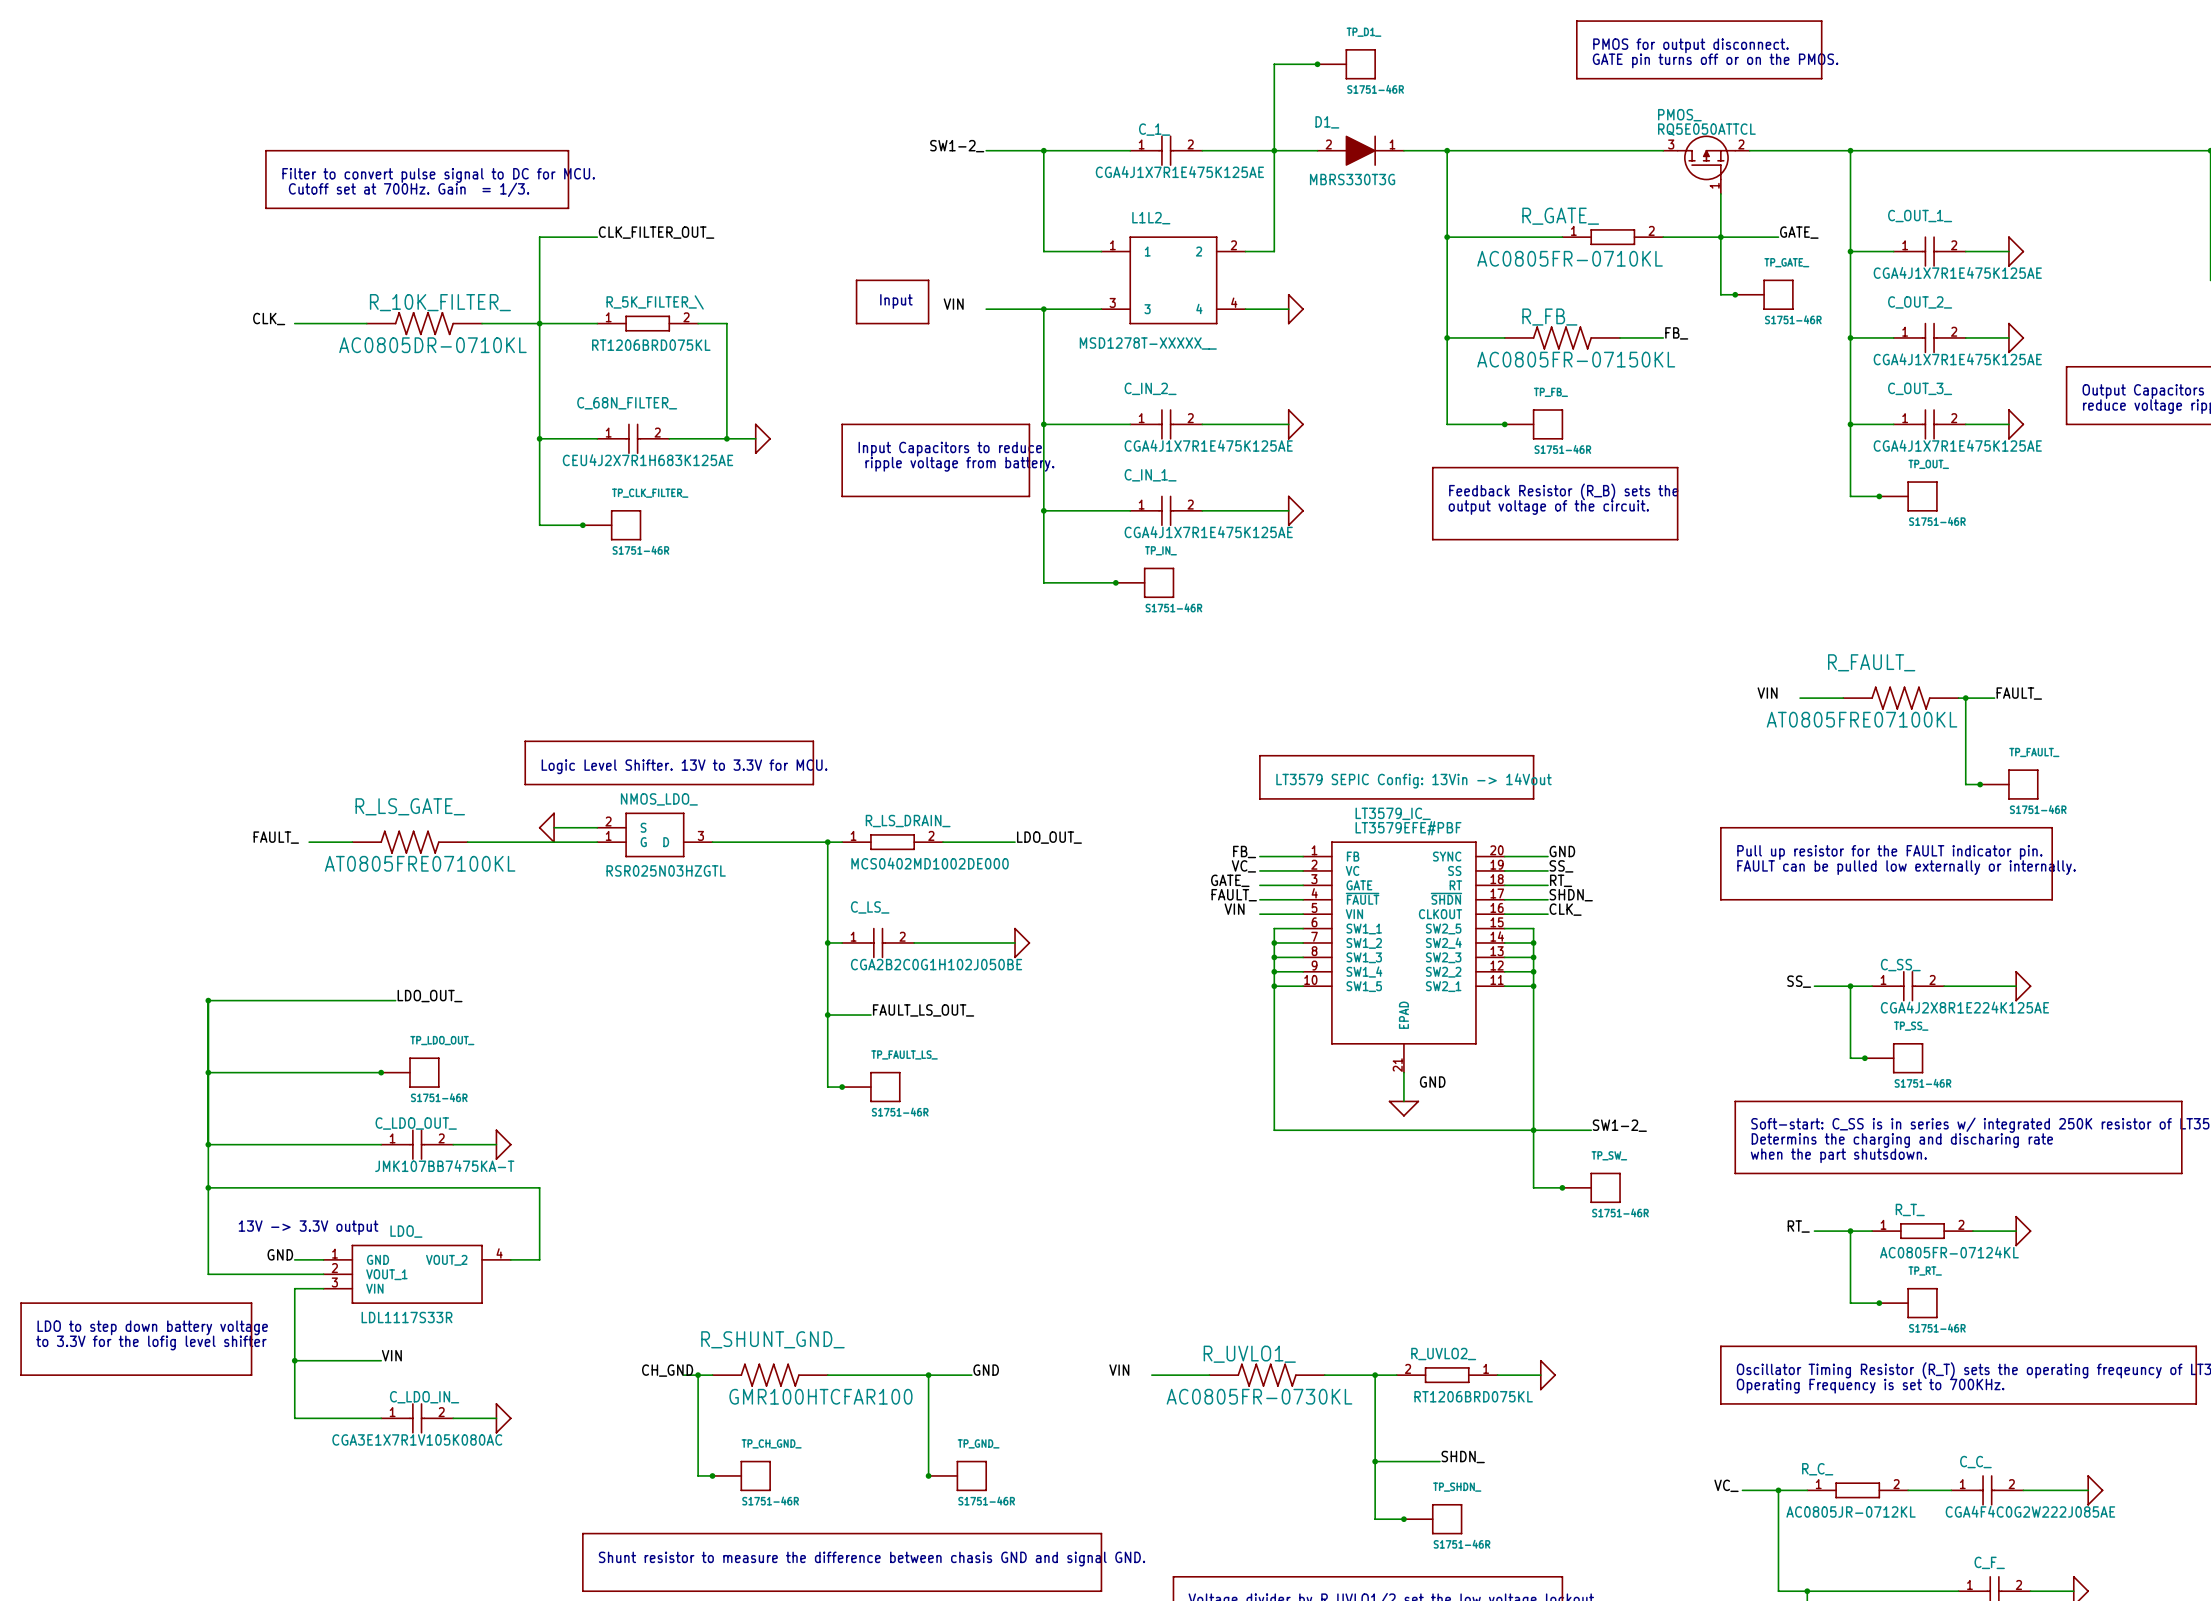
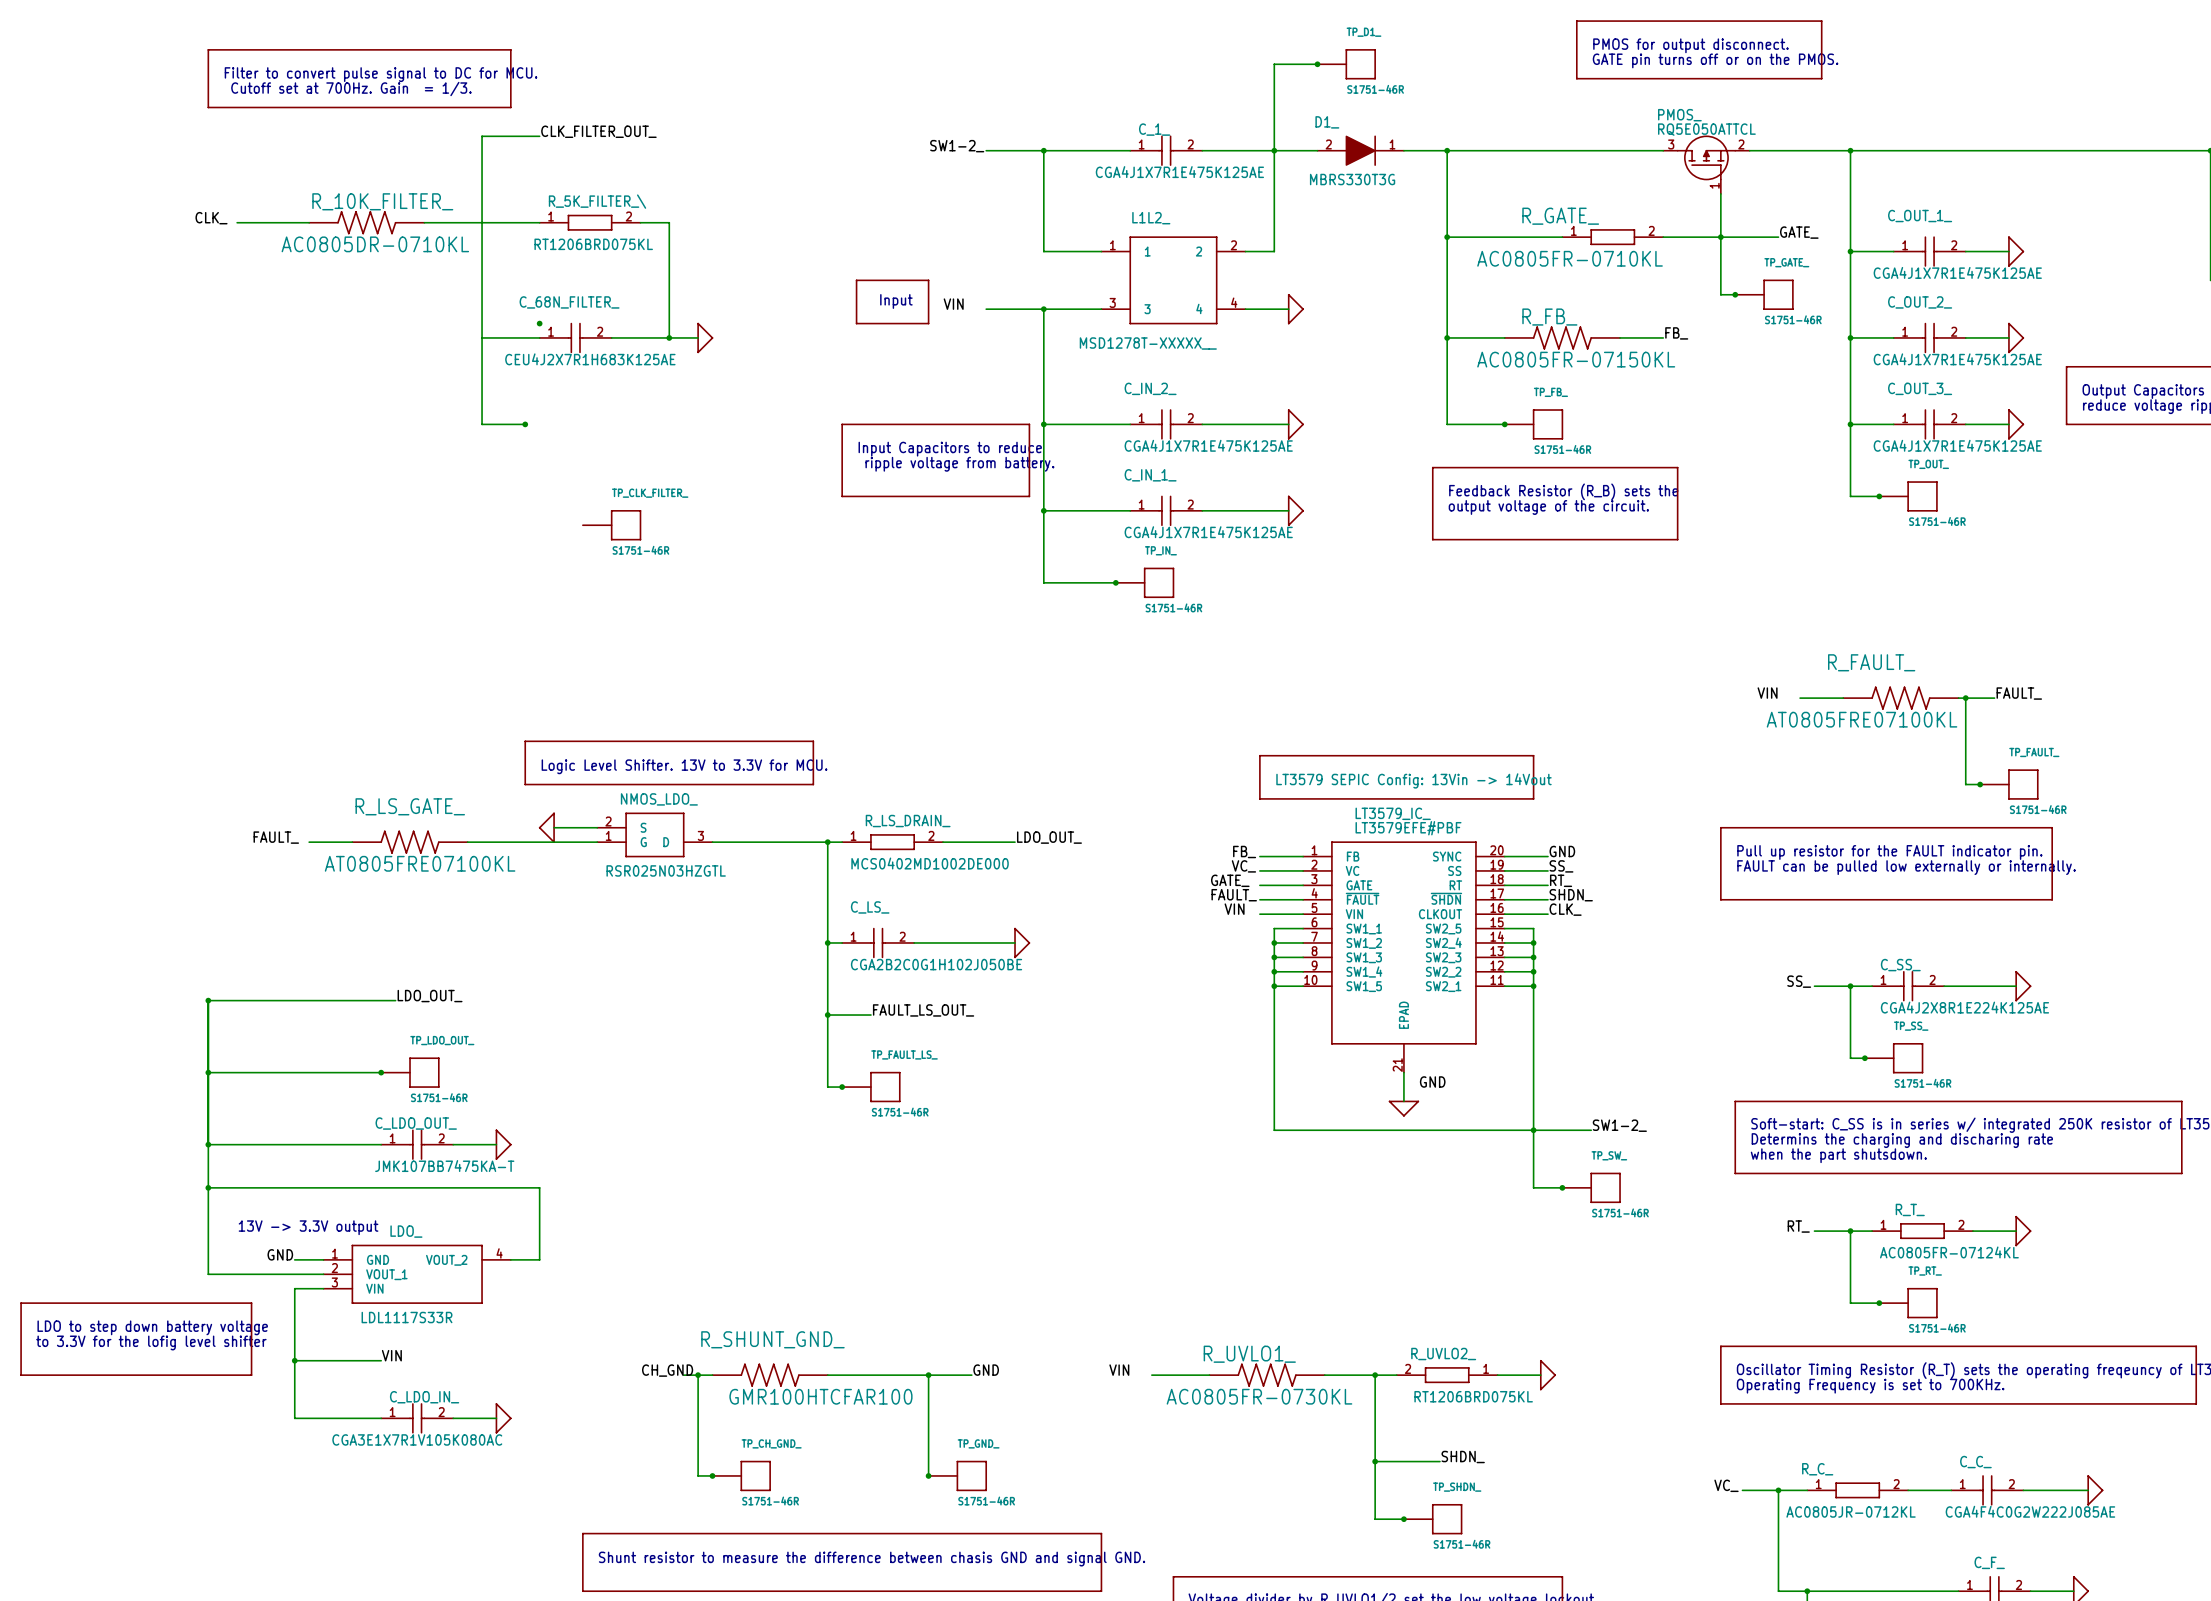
line: (265, 150) (265, 208) (568, 208) (568, 150) (265, 150) -> (208, 49) (208, 107) (510, 107) (510, 49) (208, 49)
text position: Filter to convert pulse signal to DC for MCU. (438, 175) -> Filter to convert pulse signal to DC for MCU. (381, 74)
text position: Cutoff set at 700Hz. Gain = 1/3. (409, 189) -> Cutoff set at 700Hz. Gain = 1/3. (351, 89)
label position: CLK_FILTER_OUT_ (656, 232) -> CLK_FILTER_OUT_ (598, 131)
wire: (597, 237) (539, 237) (539, 525) (582, 525) -> (539, 136) (482, 136) (482, 424) (525, 424)
label position: CLK_ (269, 319) -> CLK_ (211, 218)
wire: (294, 323) (366, 323) -> (237, 222) (309, 222)
R_10K_FILTER_ position: (424, 323) -> (366, 222)
wire: (482, 323) (597, 323) -> (424, 222) (539, 222)
R_5K_FILTER_\ position: (647, 323) -> (590, 222)
wire: (698, 323) (726, 323) (726, 438) -> (640, 222) (669, 222) (669, 337)
junction: none -> (669, 337)
wire: (539, 438) (597, 438) -> (482, 337) (539, 337)
junction position: (539, 438) -> (525, 424)
C_68N_FILTER_ position: (633, 438) -> (575, 337)
wire: (669, 438) (755, 438) -> (611, 337) (698, 337)
junction: (726, 438) -> none
power symbol position: (762, 438) -> (705, 337)
junction: (582, 525) -> none

